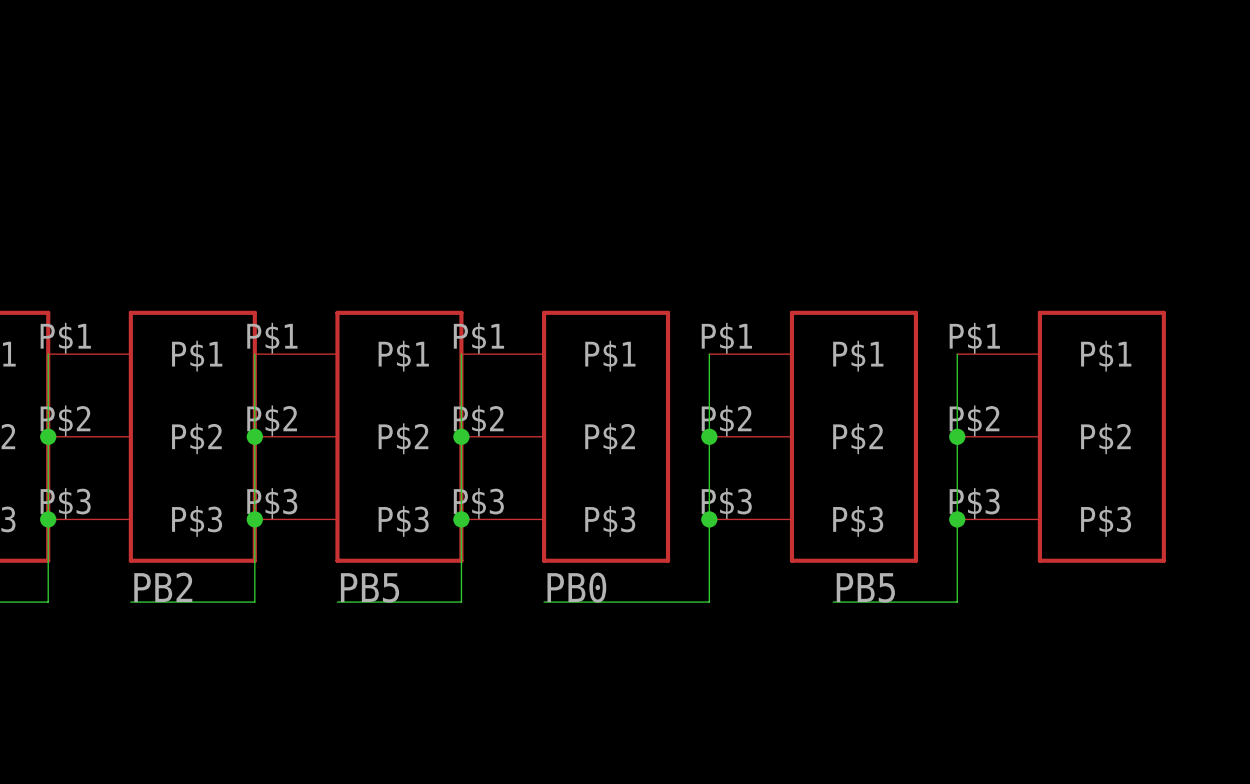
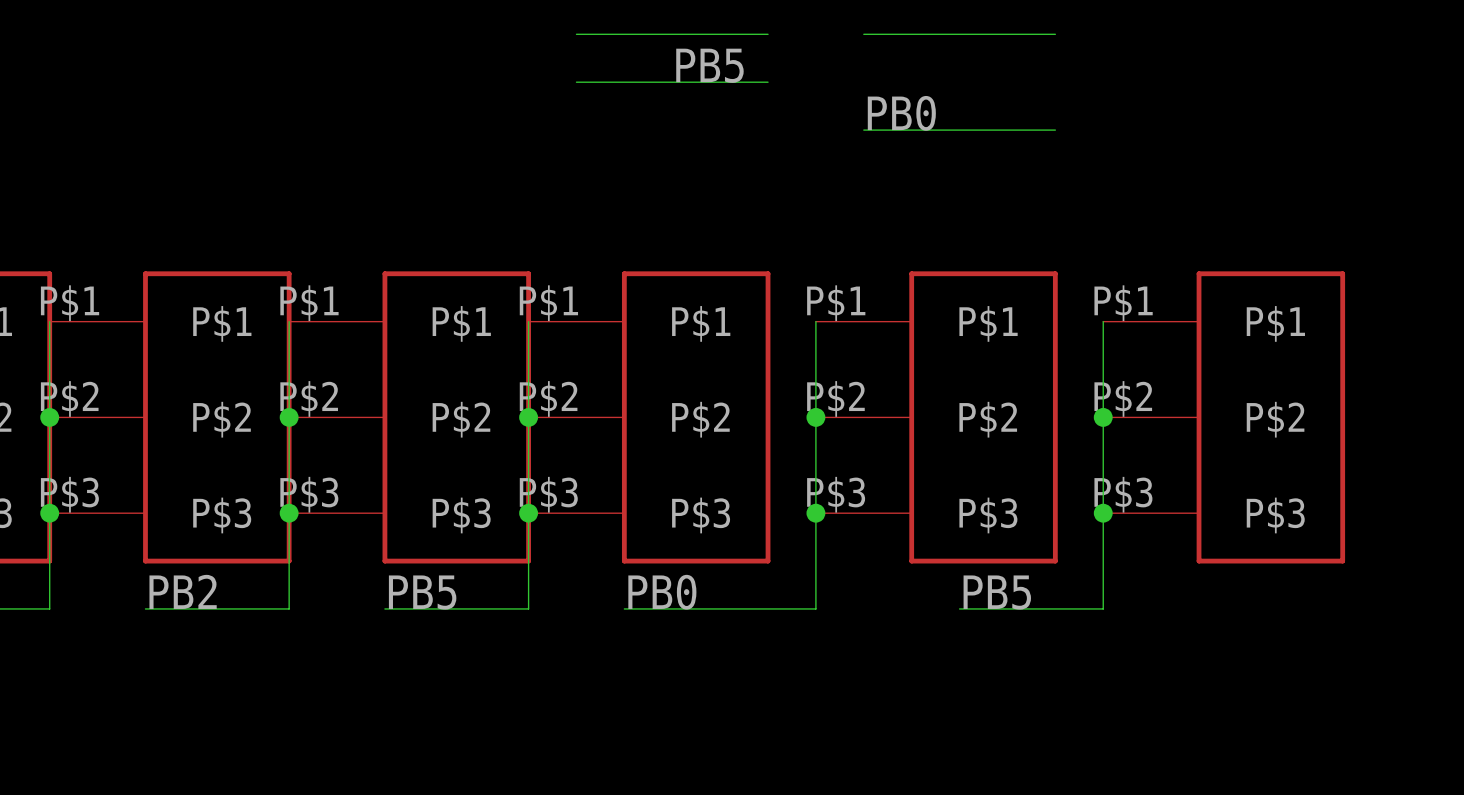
wire: none -> (576, 34) (768, 34)
wire: none -> (863, 34) (1055, 34)
label: none -> PB5 (709, 65)
wire: none -> (576, 82) (768, 82)
label: none -> PB0 (901, 113)
wire: none -> (863, 130) (1055, 130)

